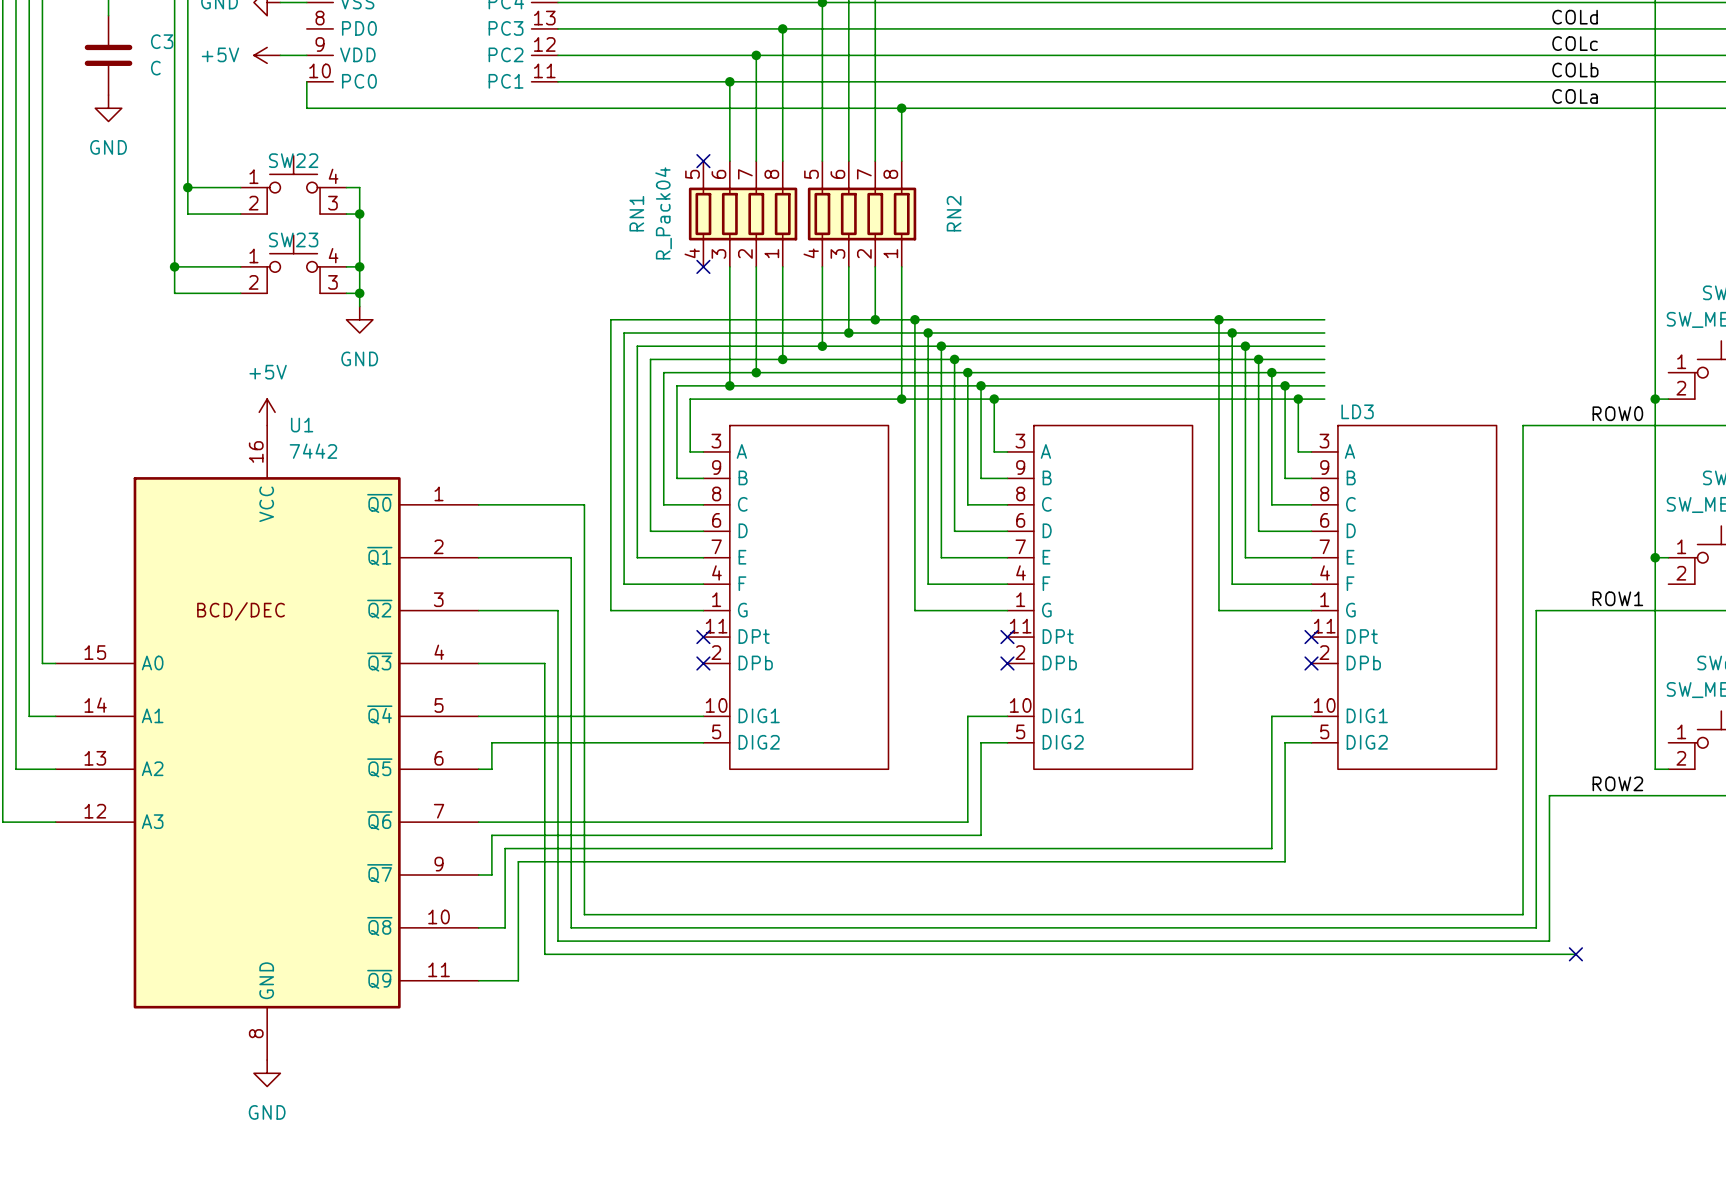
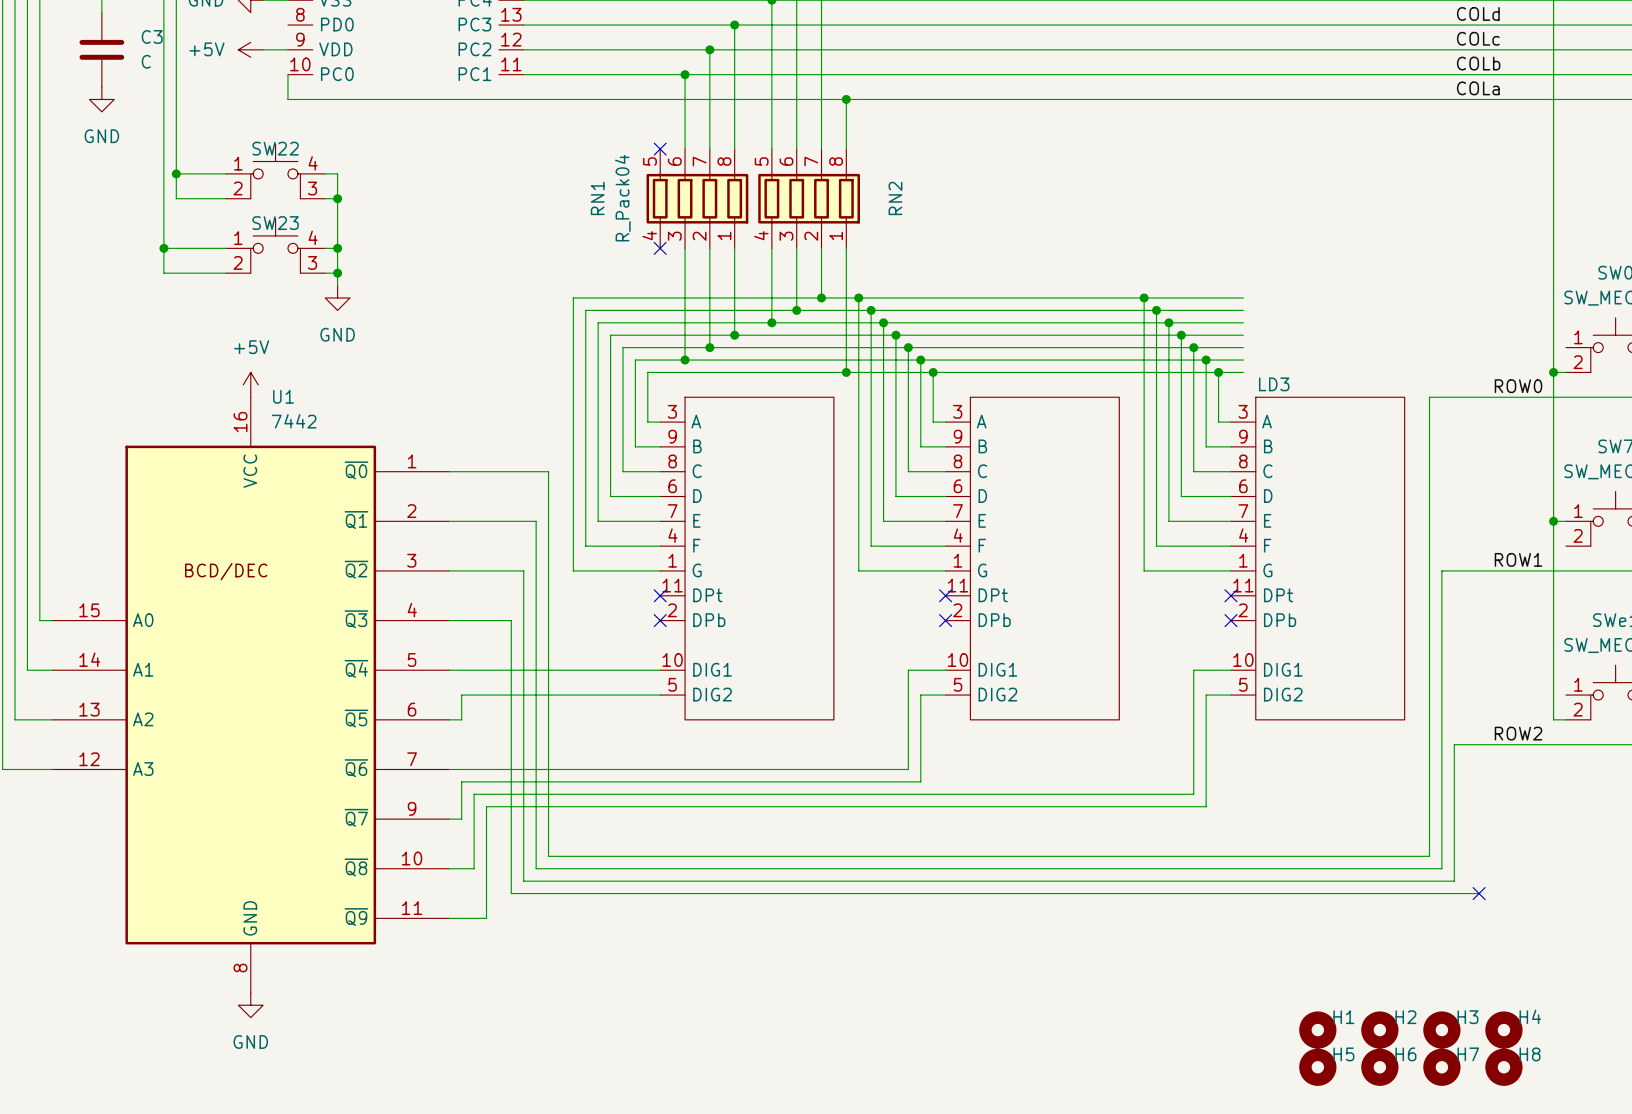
H1: none -> (1317, 1030)
H2: none -> (1379, 1030)
H3: none -> (1441, 1030)
H4: none -> (1503, 1030)
H5: none -> (1317, 1067)
H6: none -> (1379, 1067)
H7: none -> (1441, 1067)
H8: none -> (1503, 1067)

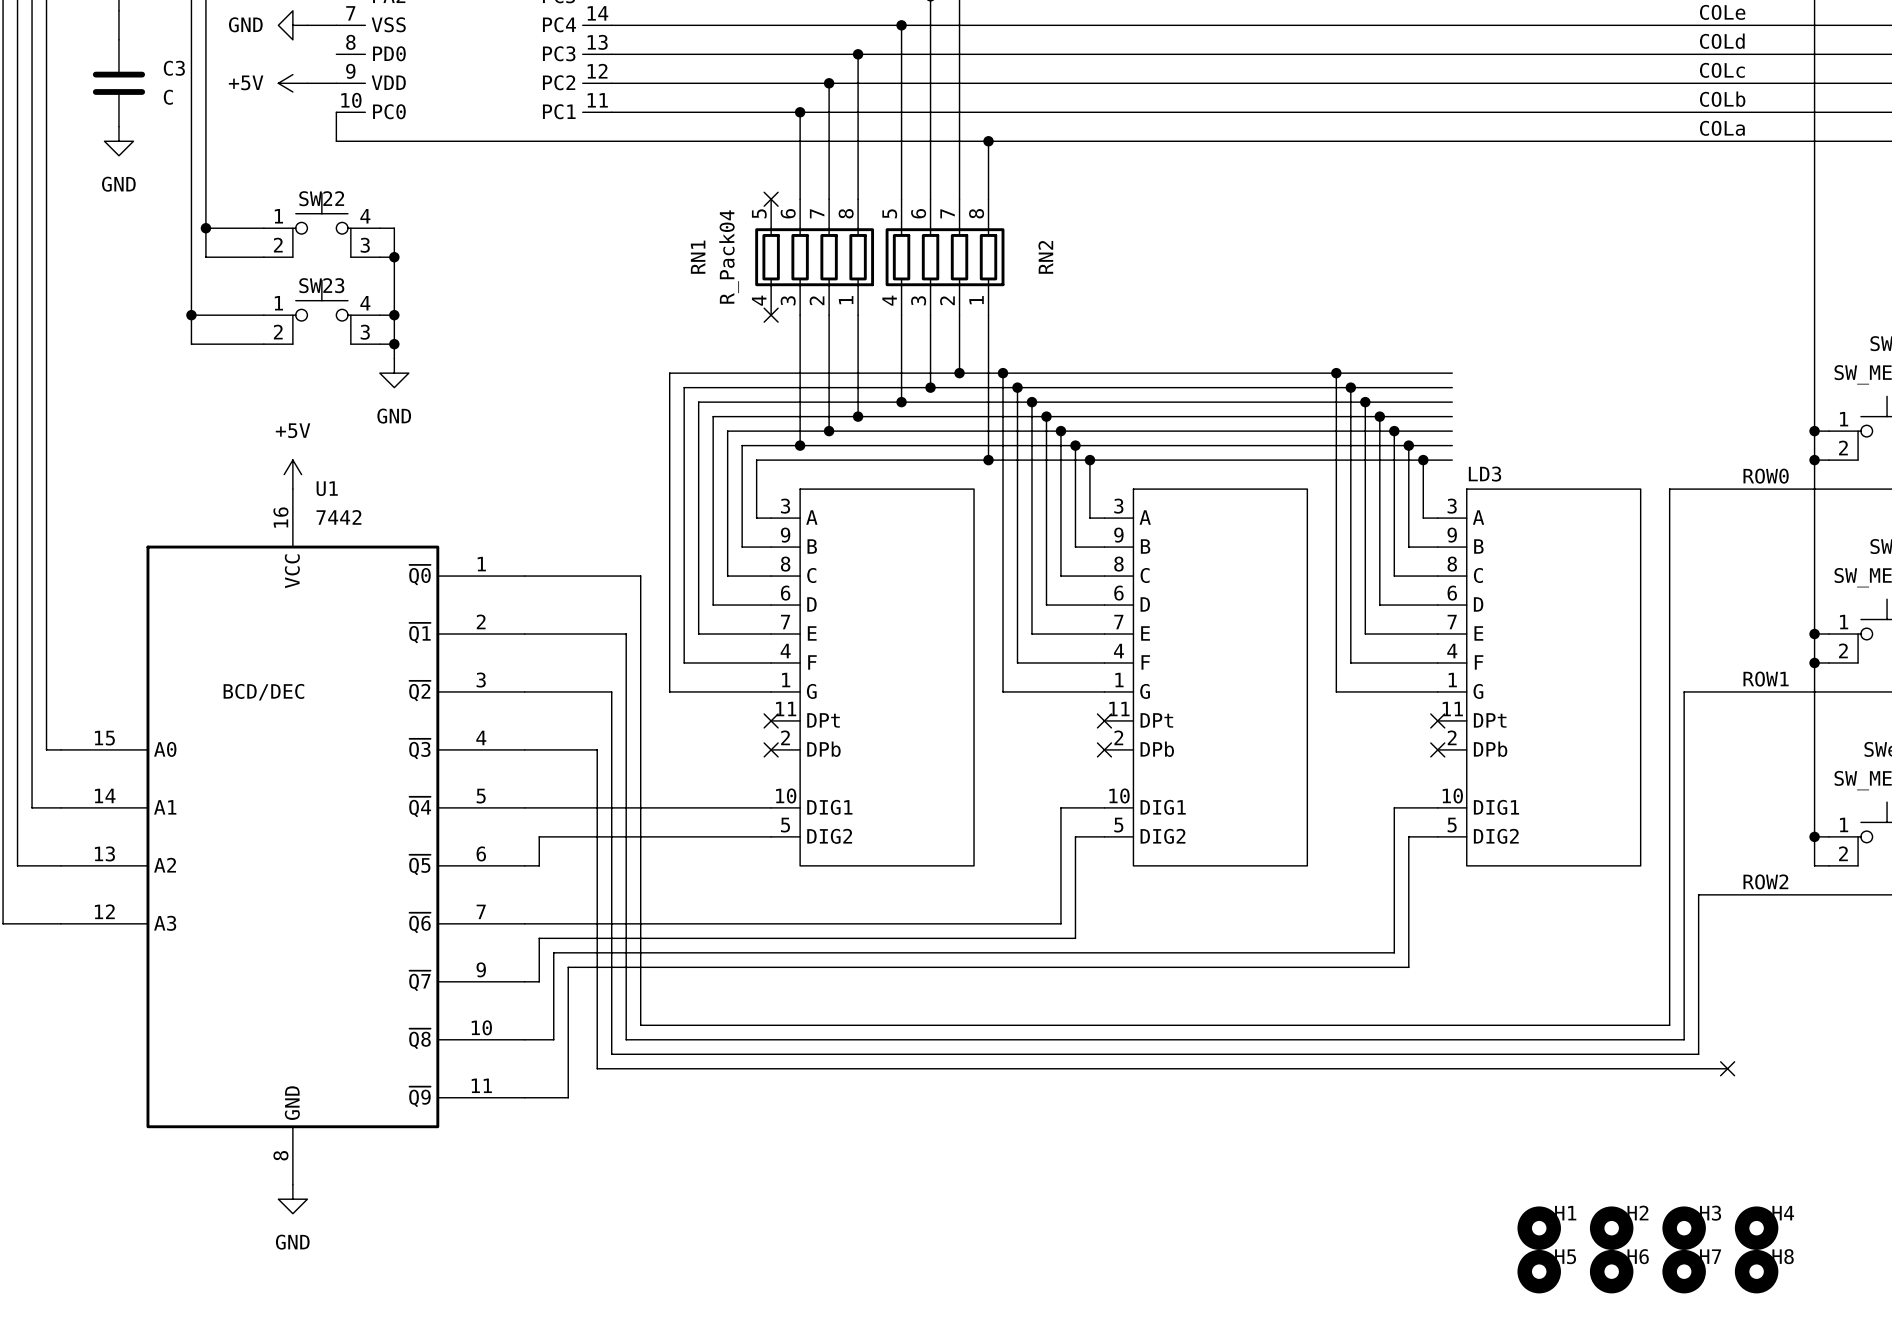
wire: none -> (1814, 431) (1829, 431)
junction: none -> (1814, 431)
wire: none -> (1814, 662) (1829, 662)
junction: none -> (1814, 662)
wire: none -> (1814, 836) (1829, 836)
junction: none -> (1814, 836)

